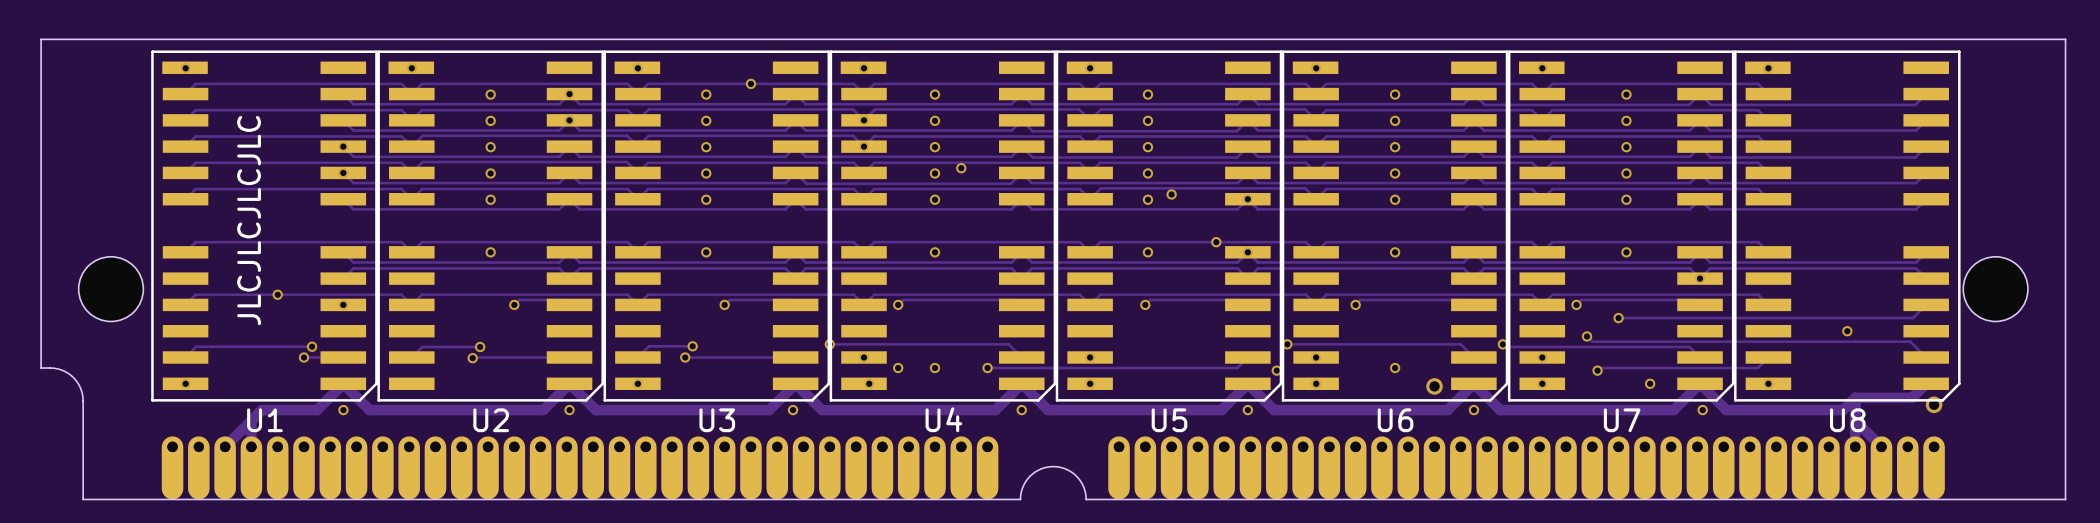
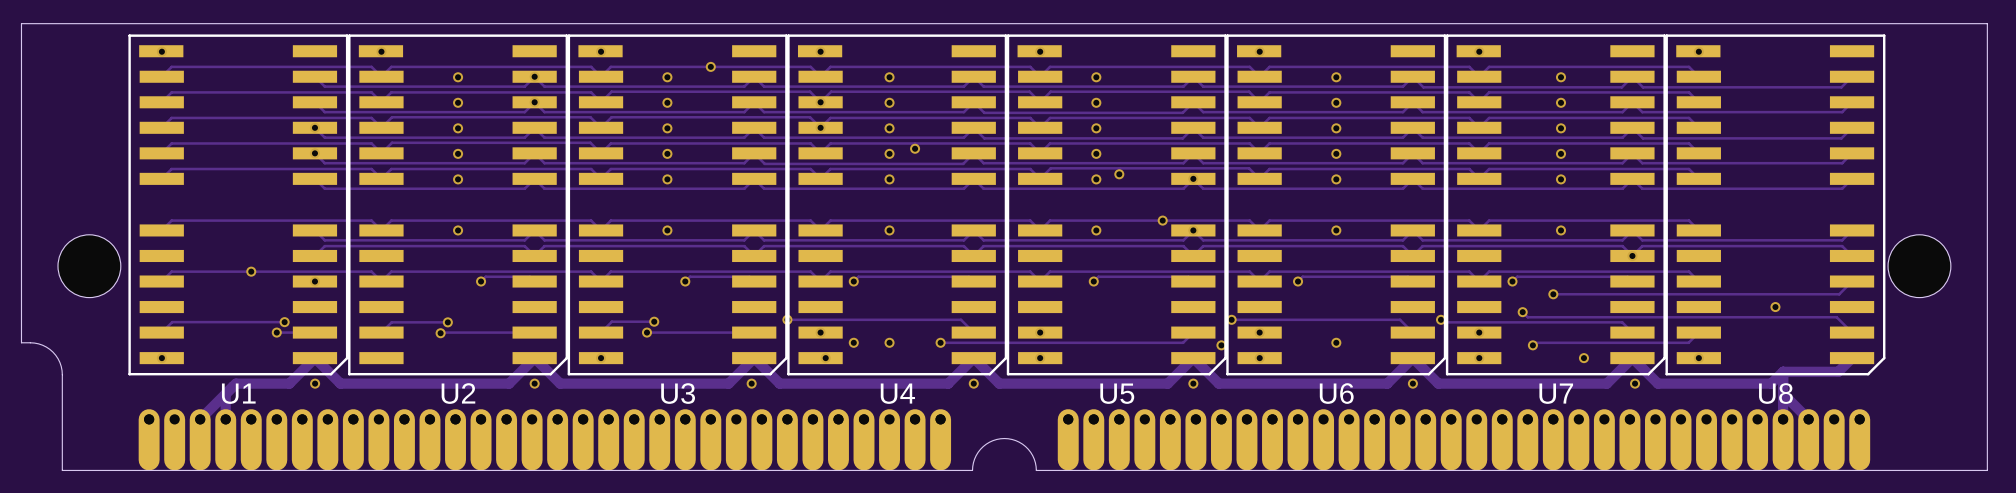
text: JLCJLCJLCJLC (249, 220) -> none
via: (1434, 386) -> none
via: (1934, 404) -> none

